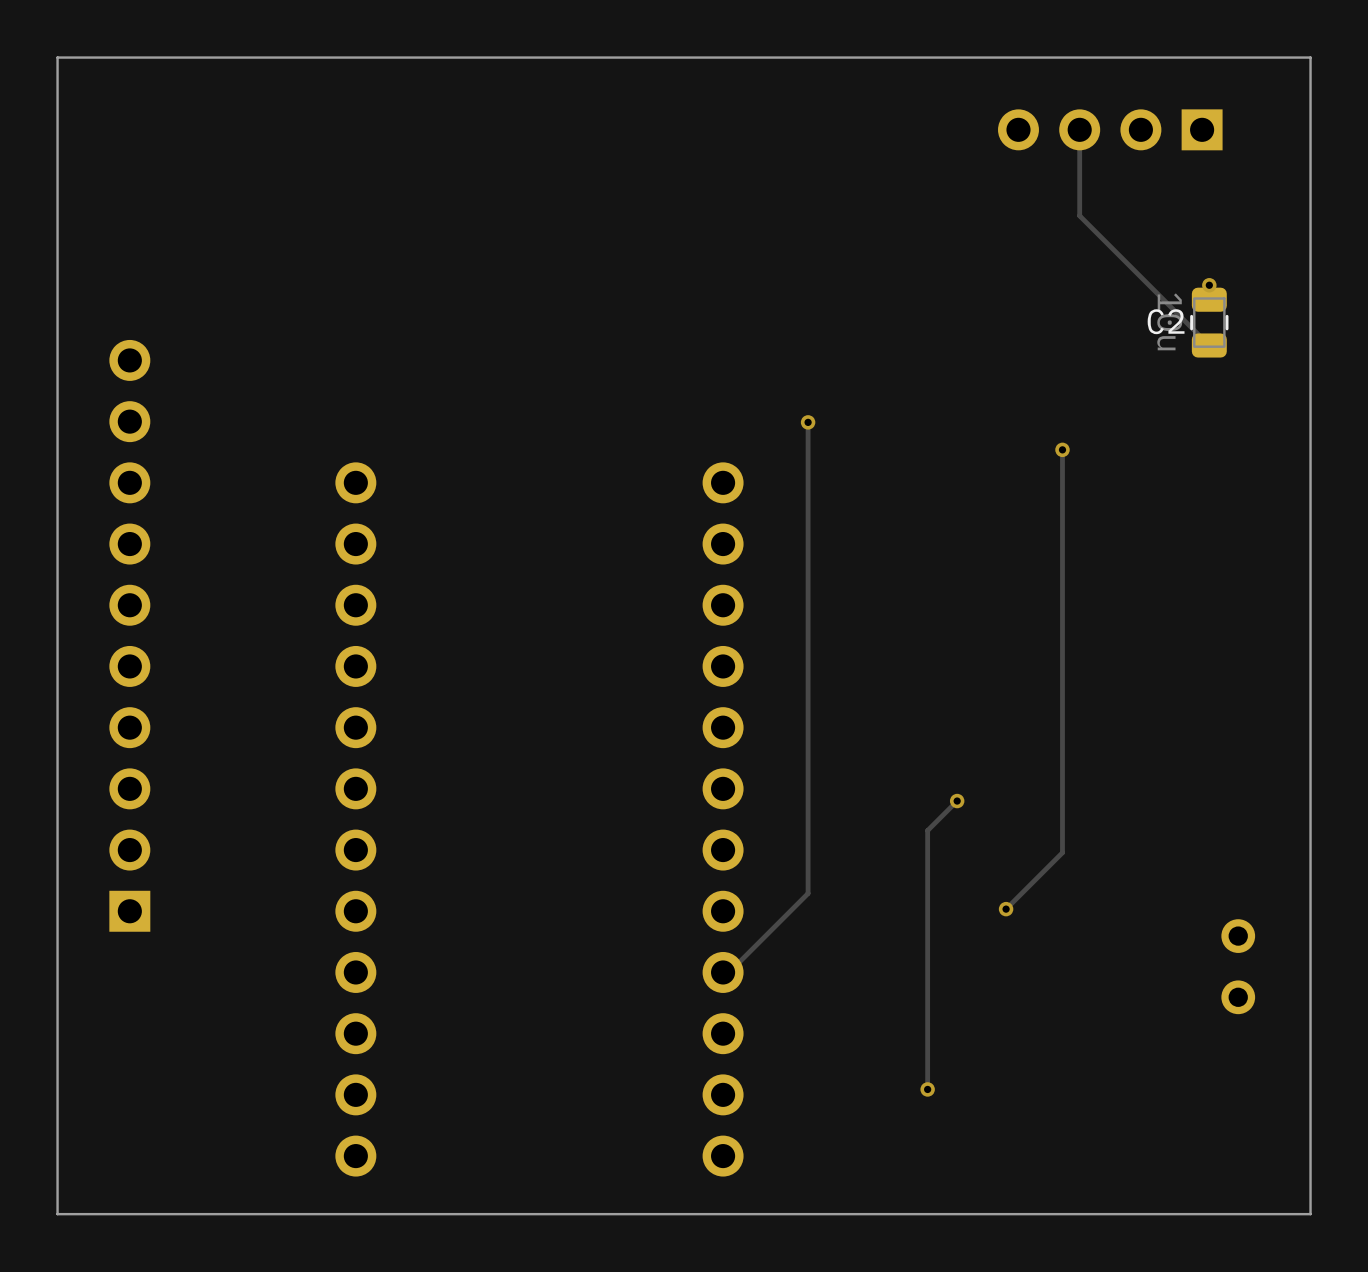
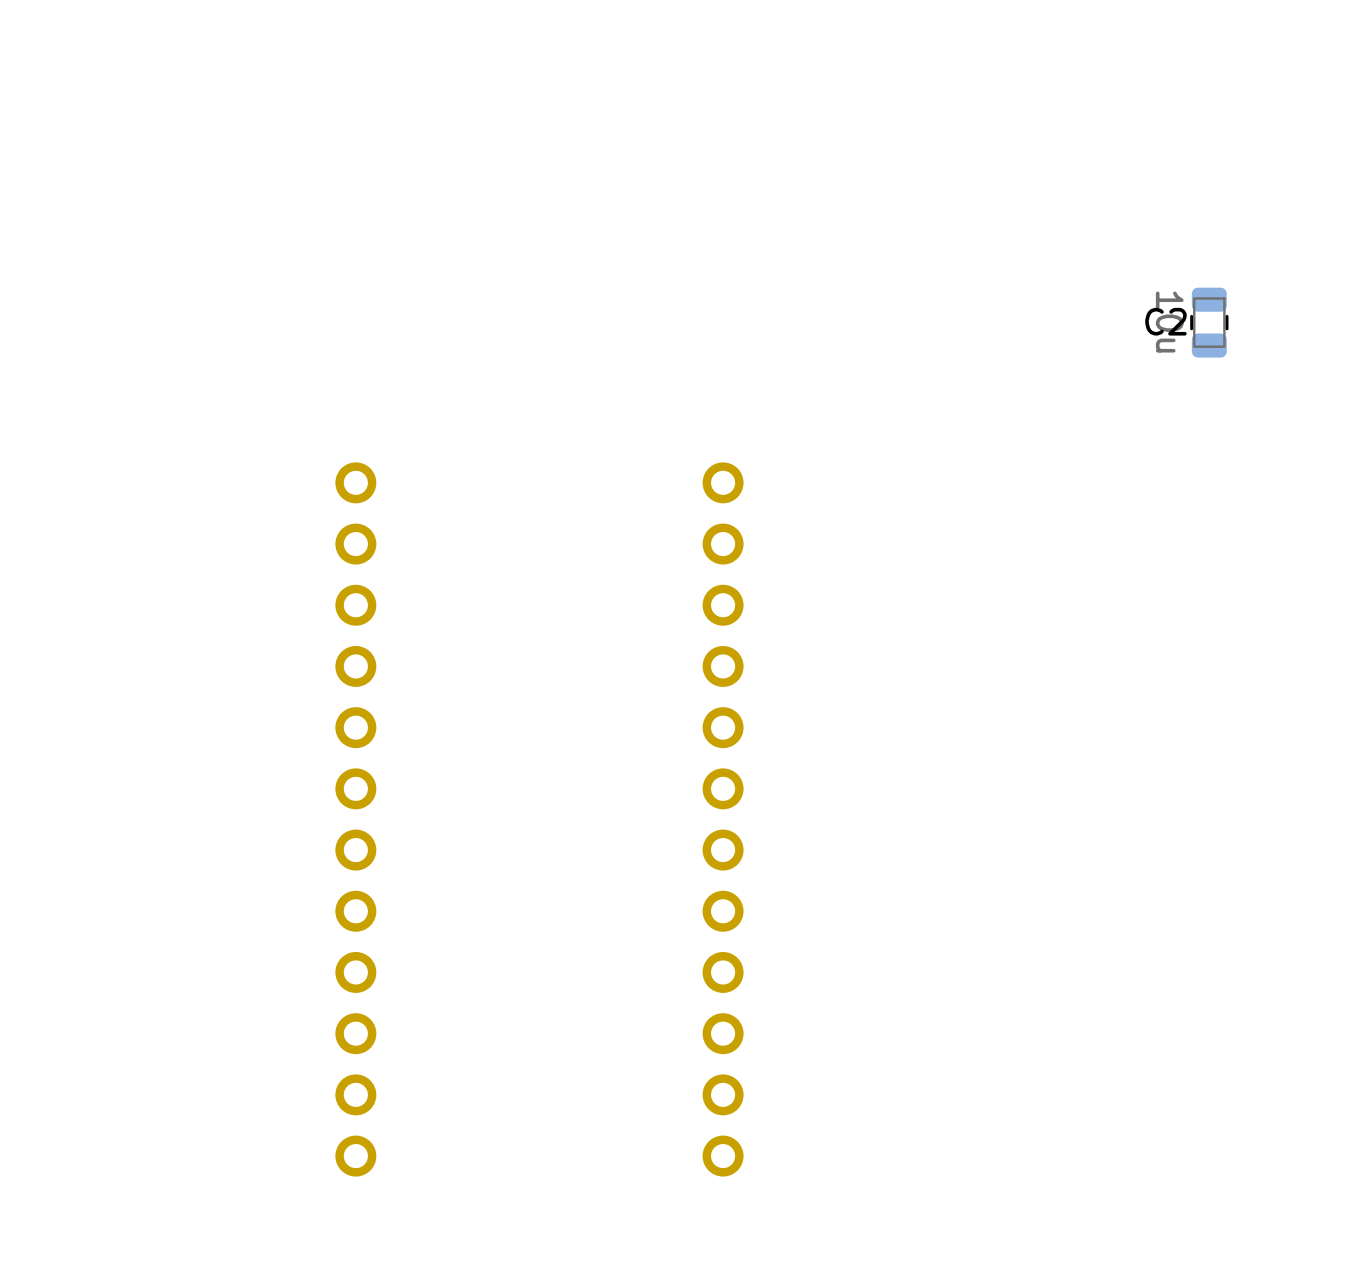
board edge: (1310, 57) (57, 57) (57, 1214) (1310, 1214) (1310, 57) -> none
track: (1079, 129) (1079, 215) (1209, 345) -> none
part: (1110, 129) -> none
via: (1209, 285) -> none
track: (808, 422) (808, 893) (729, 972) (723, 972) -> none
via: (808, 422) -> none
track: (1062, 449) (1062, 852) (1006, 909) -> none
via: (1062, 449) -> none
part: (129, 635) -> none
track: (957, 801) (927, 830) (927, 1089) -> none
via: (957, 801) -> none
via: (1006, 909) -> none
part: (1238, 966) -> none
via: (927, 1089) -> none

